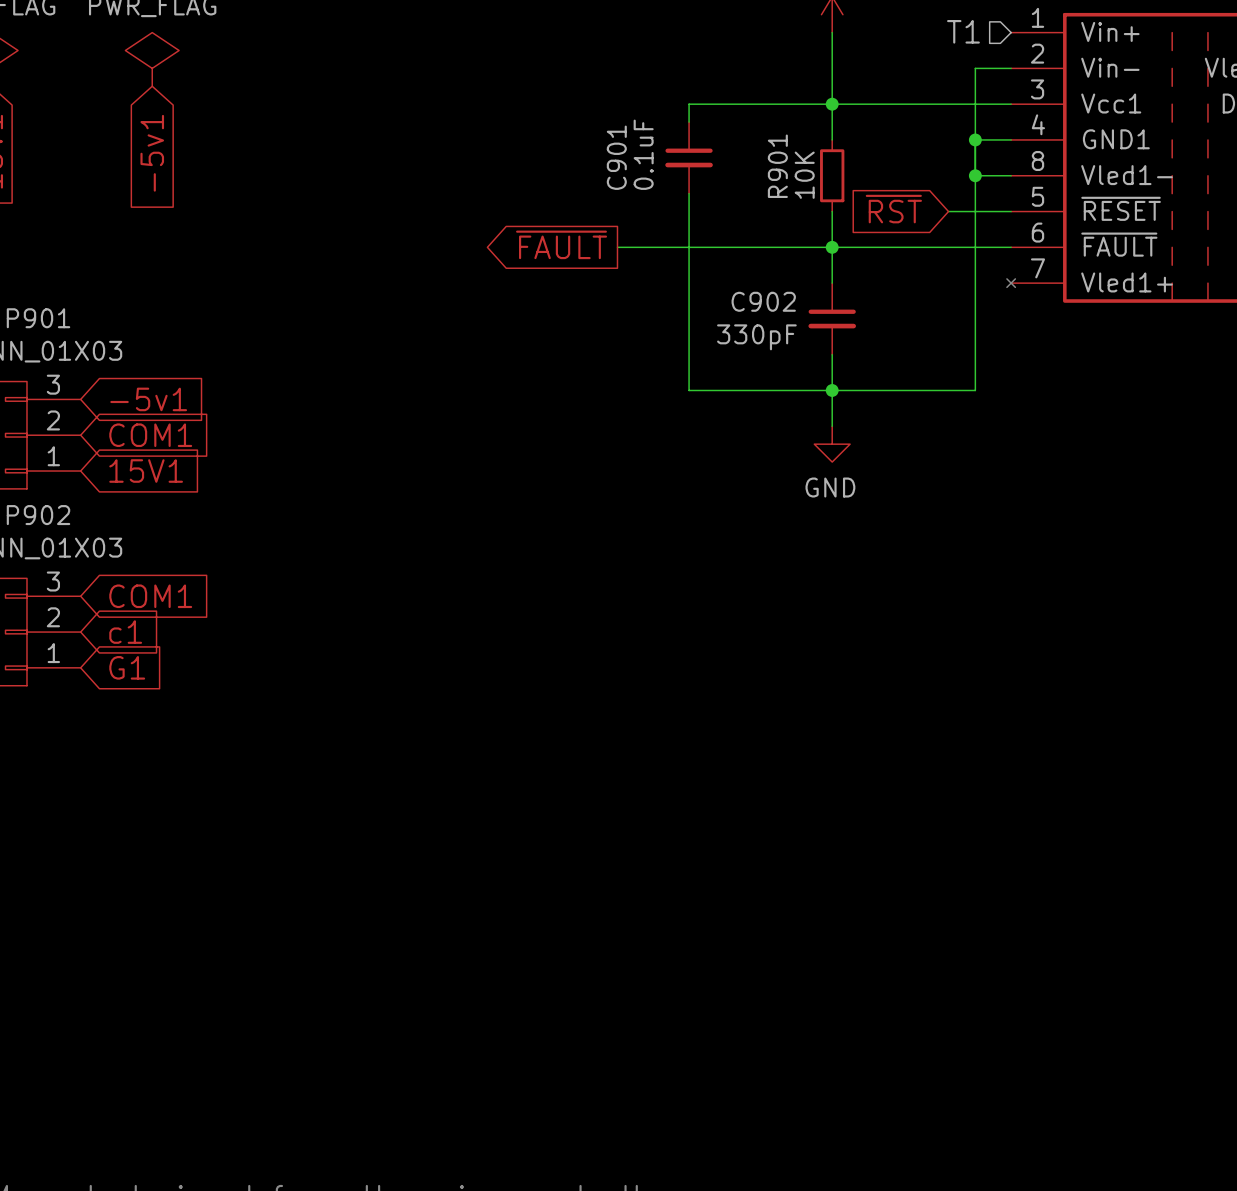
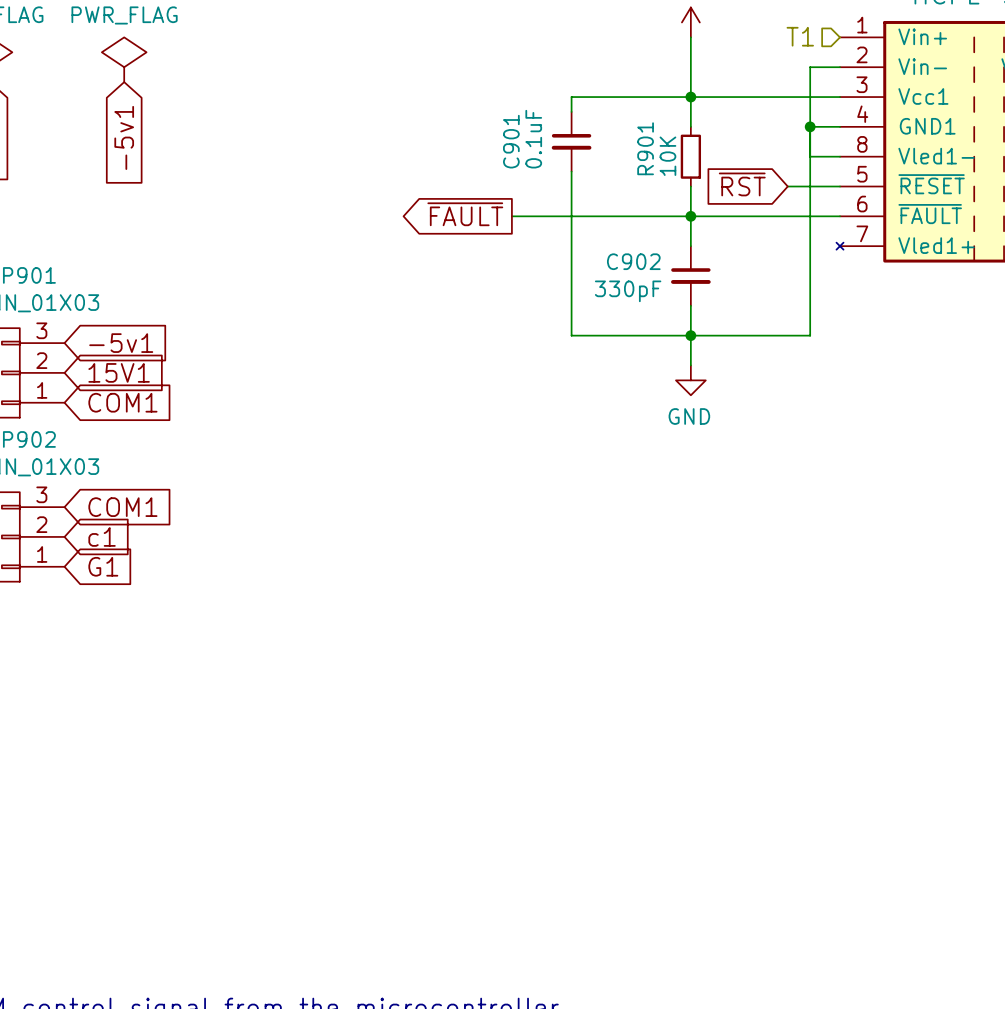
junction: (975, 175) -> none
global label: COM1 (150, 435) -> 15V1 (119, 372)
global label: 15V1 (146, 471) -> COM1 (122, 402)

